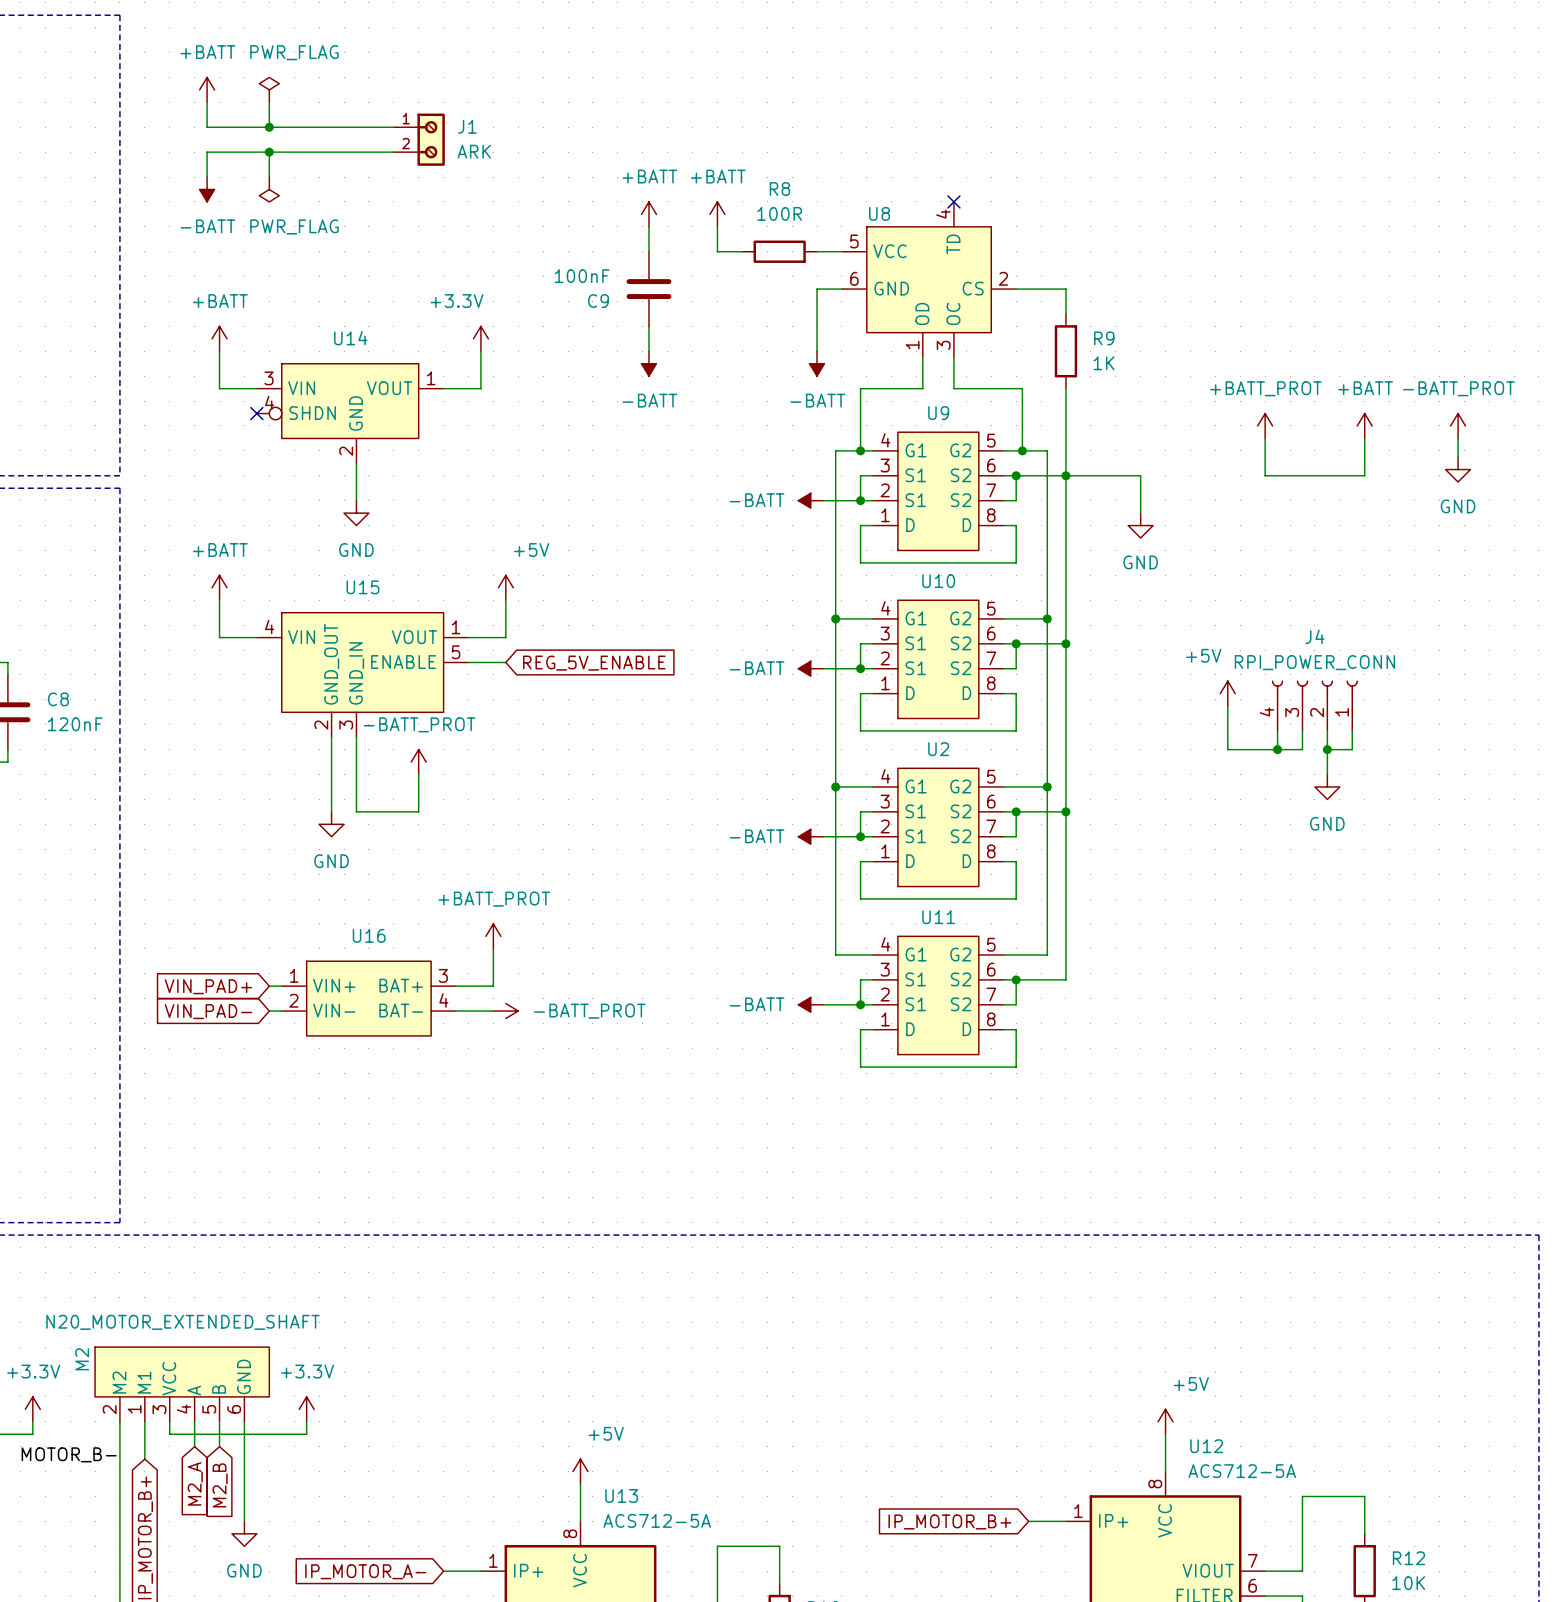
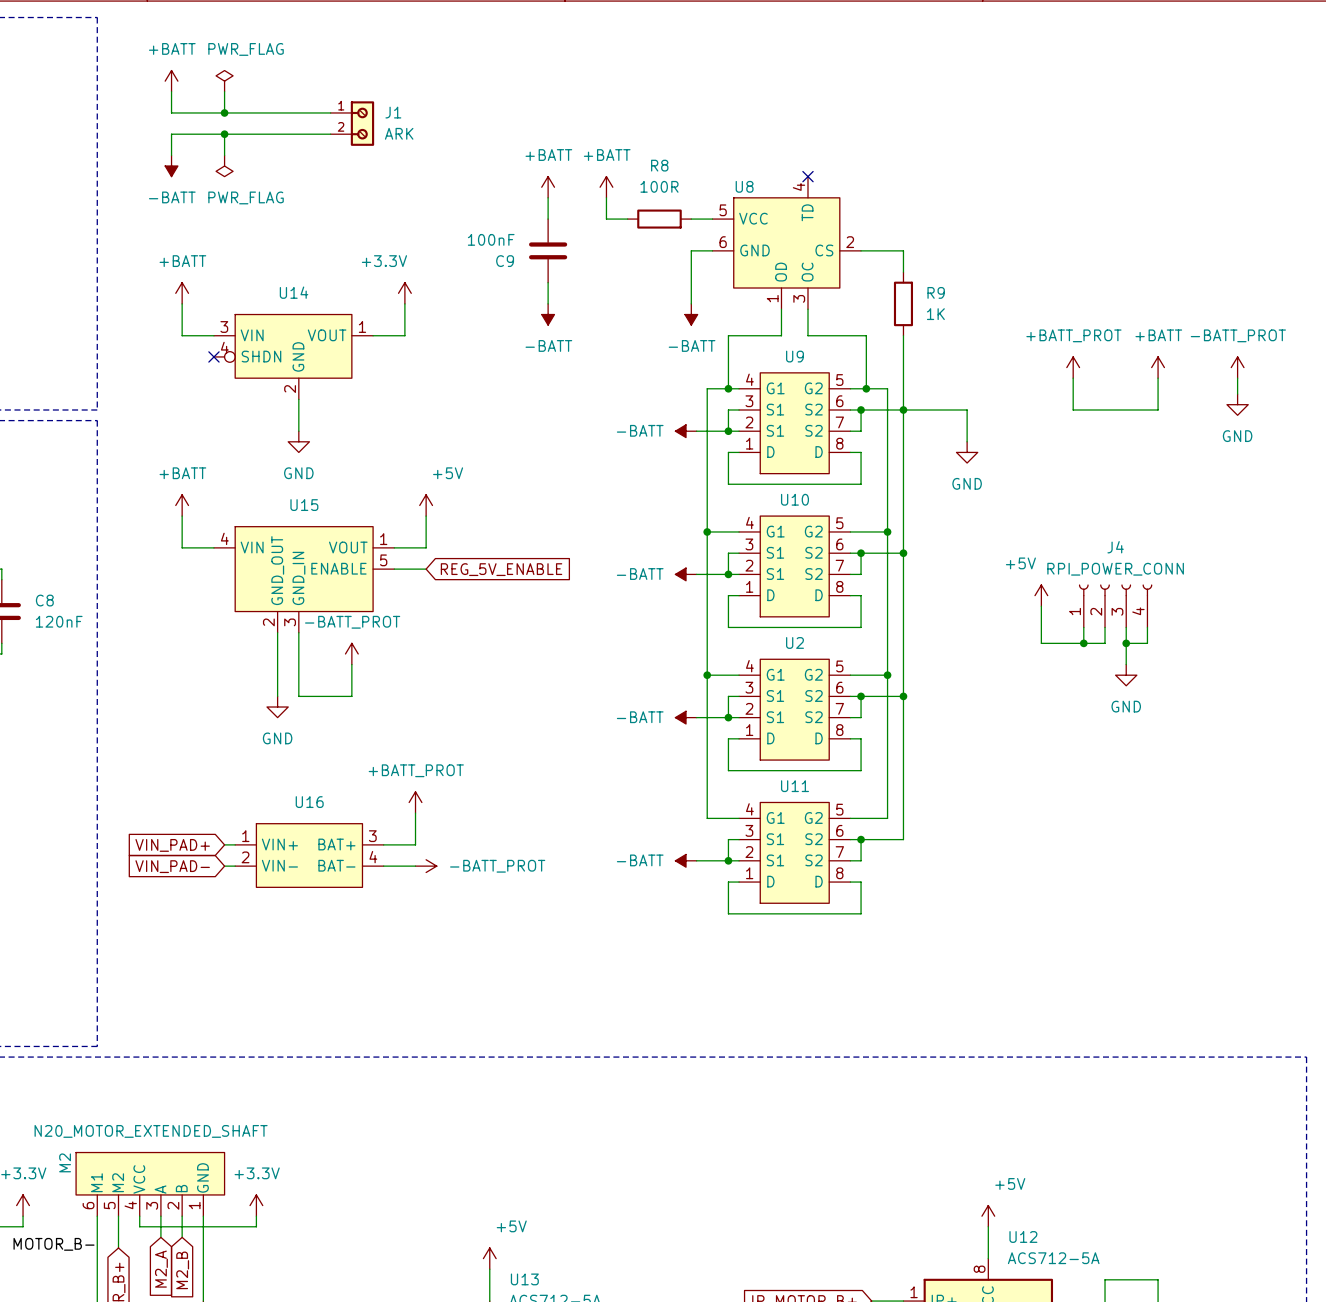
J4 flip: as is (1314, 687) -> left-right (1115, 590)
M2 pin name: M2 (119, 1382) -> M1 (96, 1182)
M2 pin name: M1 (144, 1382) -> M2 (118, 1182)
M2 pin number: 2 (109, 1409) -> 6 (88, 1205)
M2 pin number: 1 (134, 1409) -> 5 (109, 1205)
M2 pin number: 3 (159, 1409) -> 4 (130, 1205)
M2 pin number: 4 (184, 1409) -> 3 (152, 1205)
M2 pin number: 5 (209, 1409) -> 2 (173, 1205)
M2 pin number: 6 (234, 1409) -> 1 (194, 1205)

